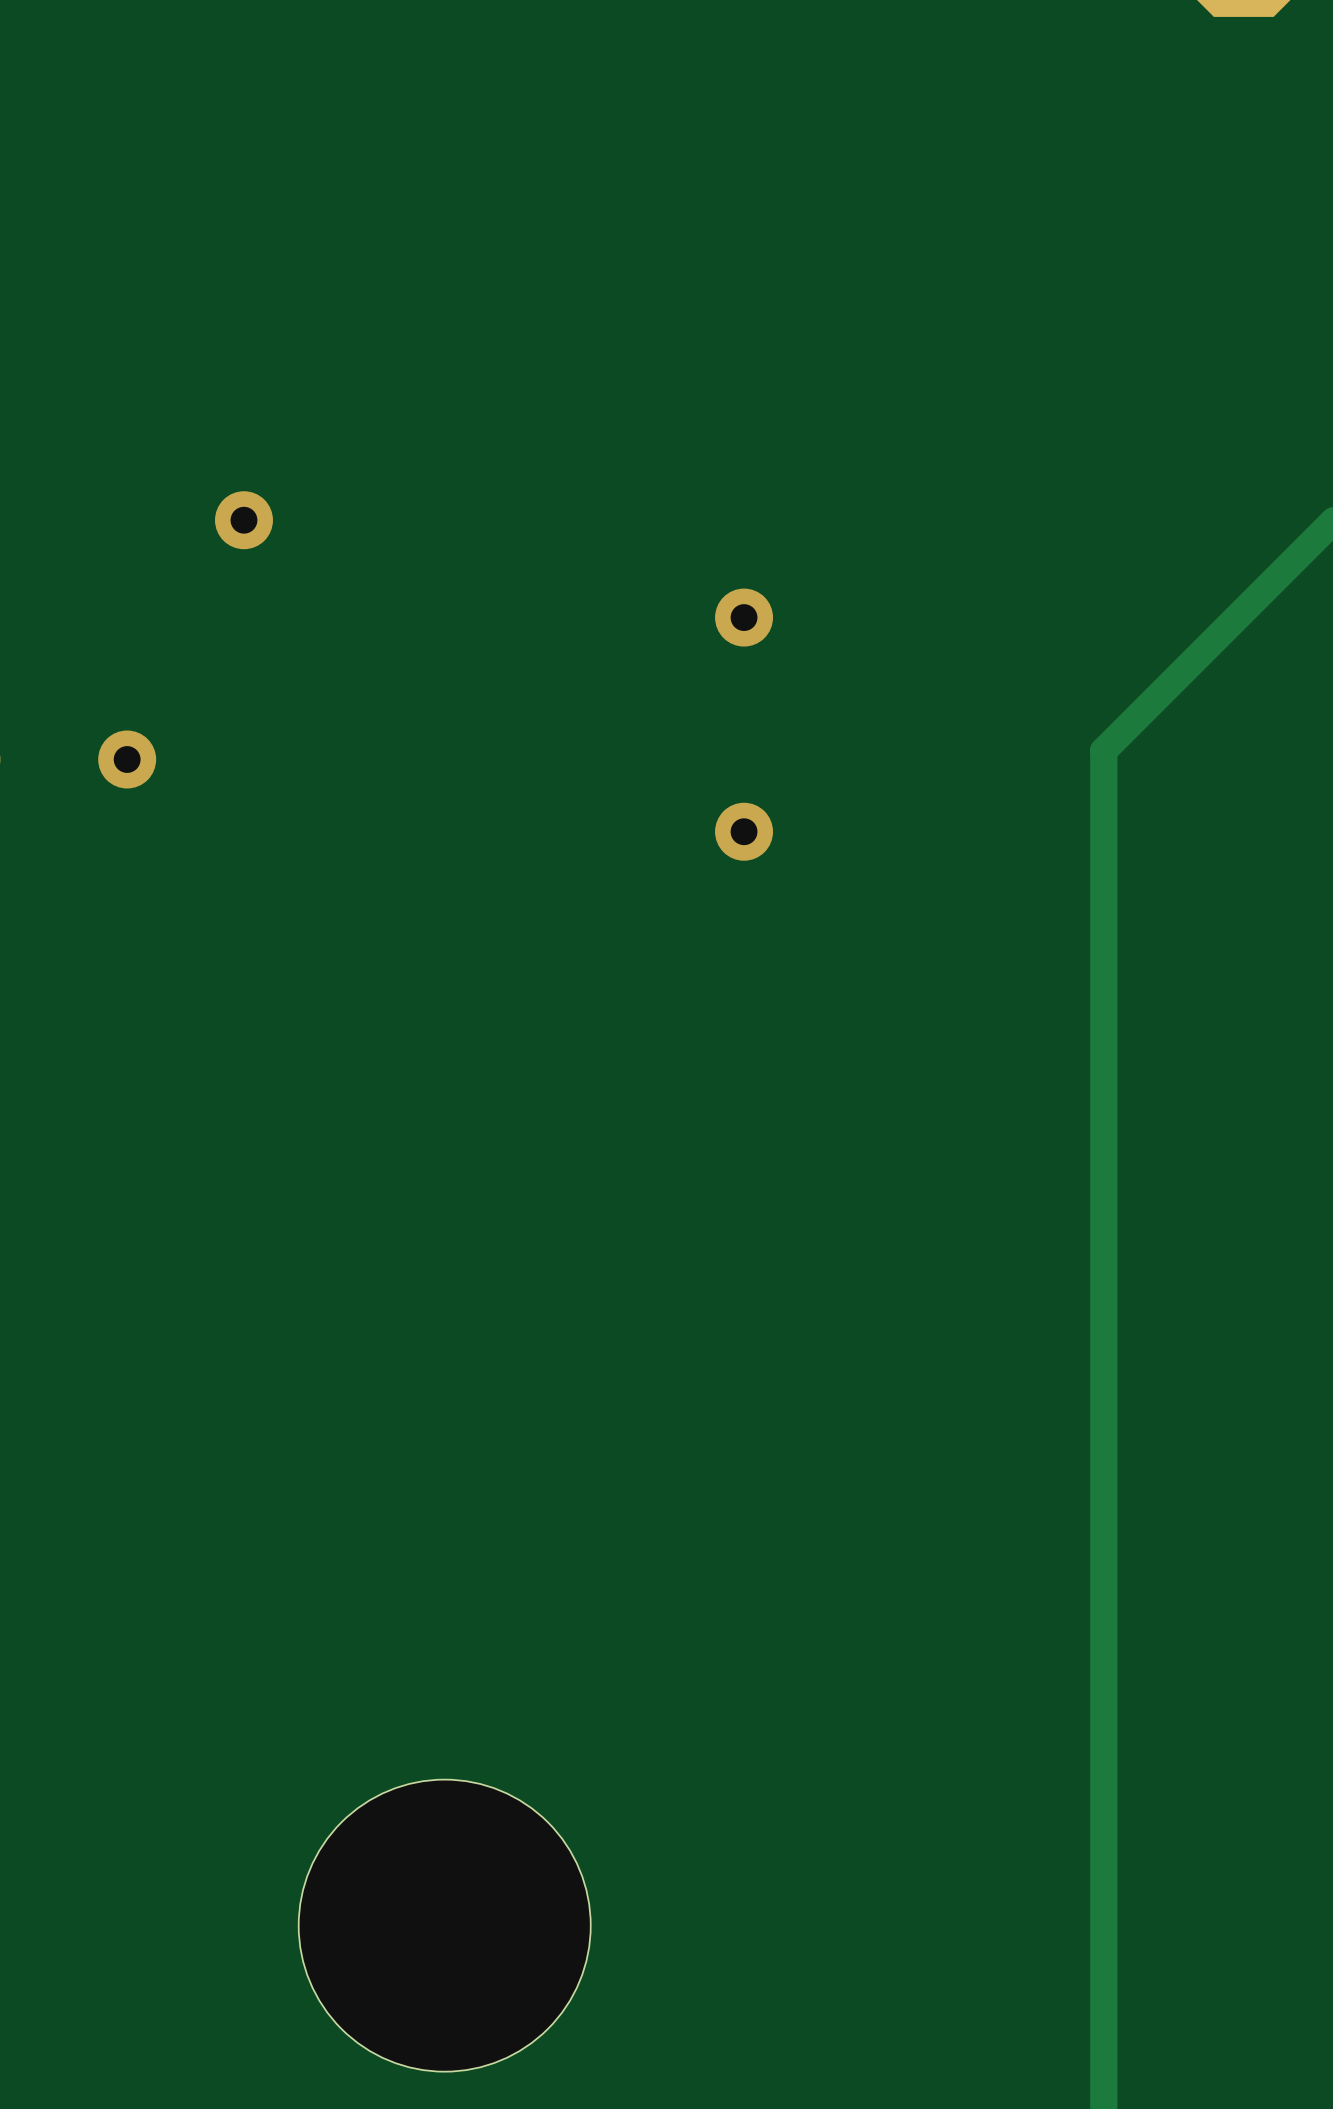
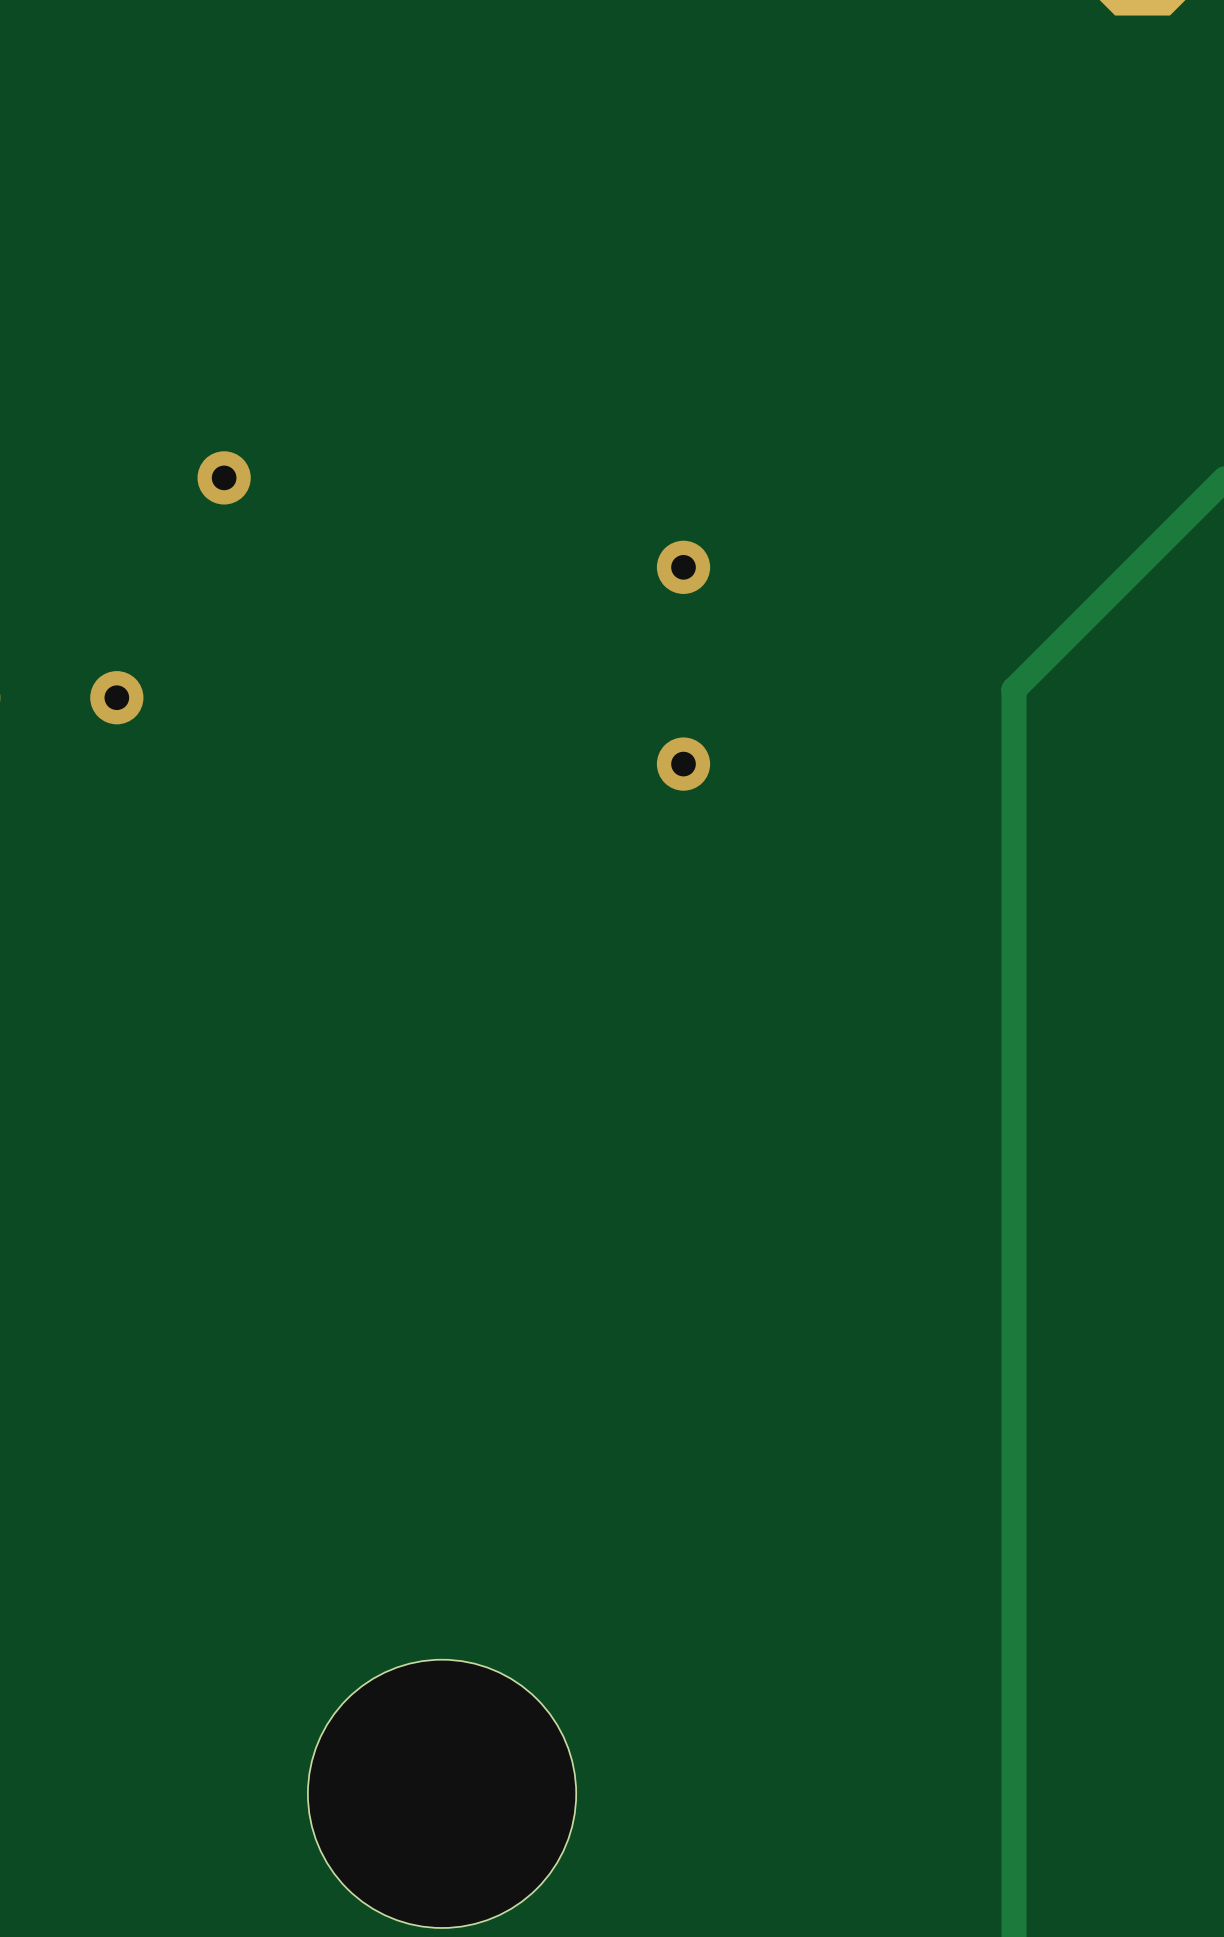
hole position: (444, 1925) -> (442, 1793)

